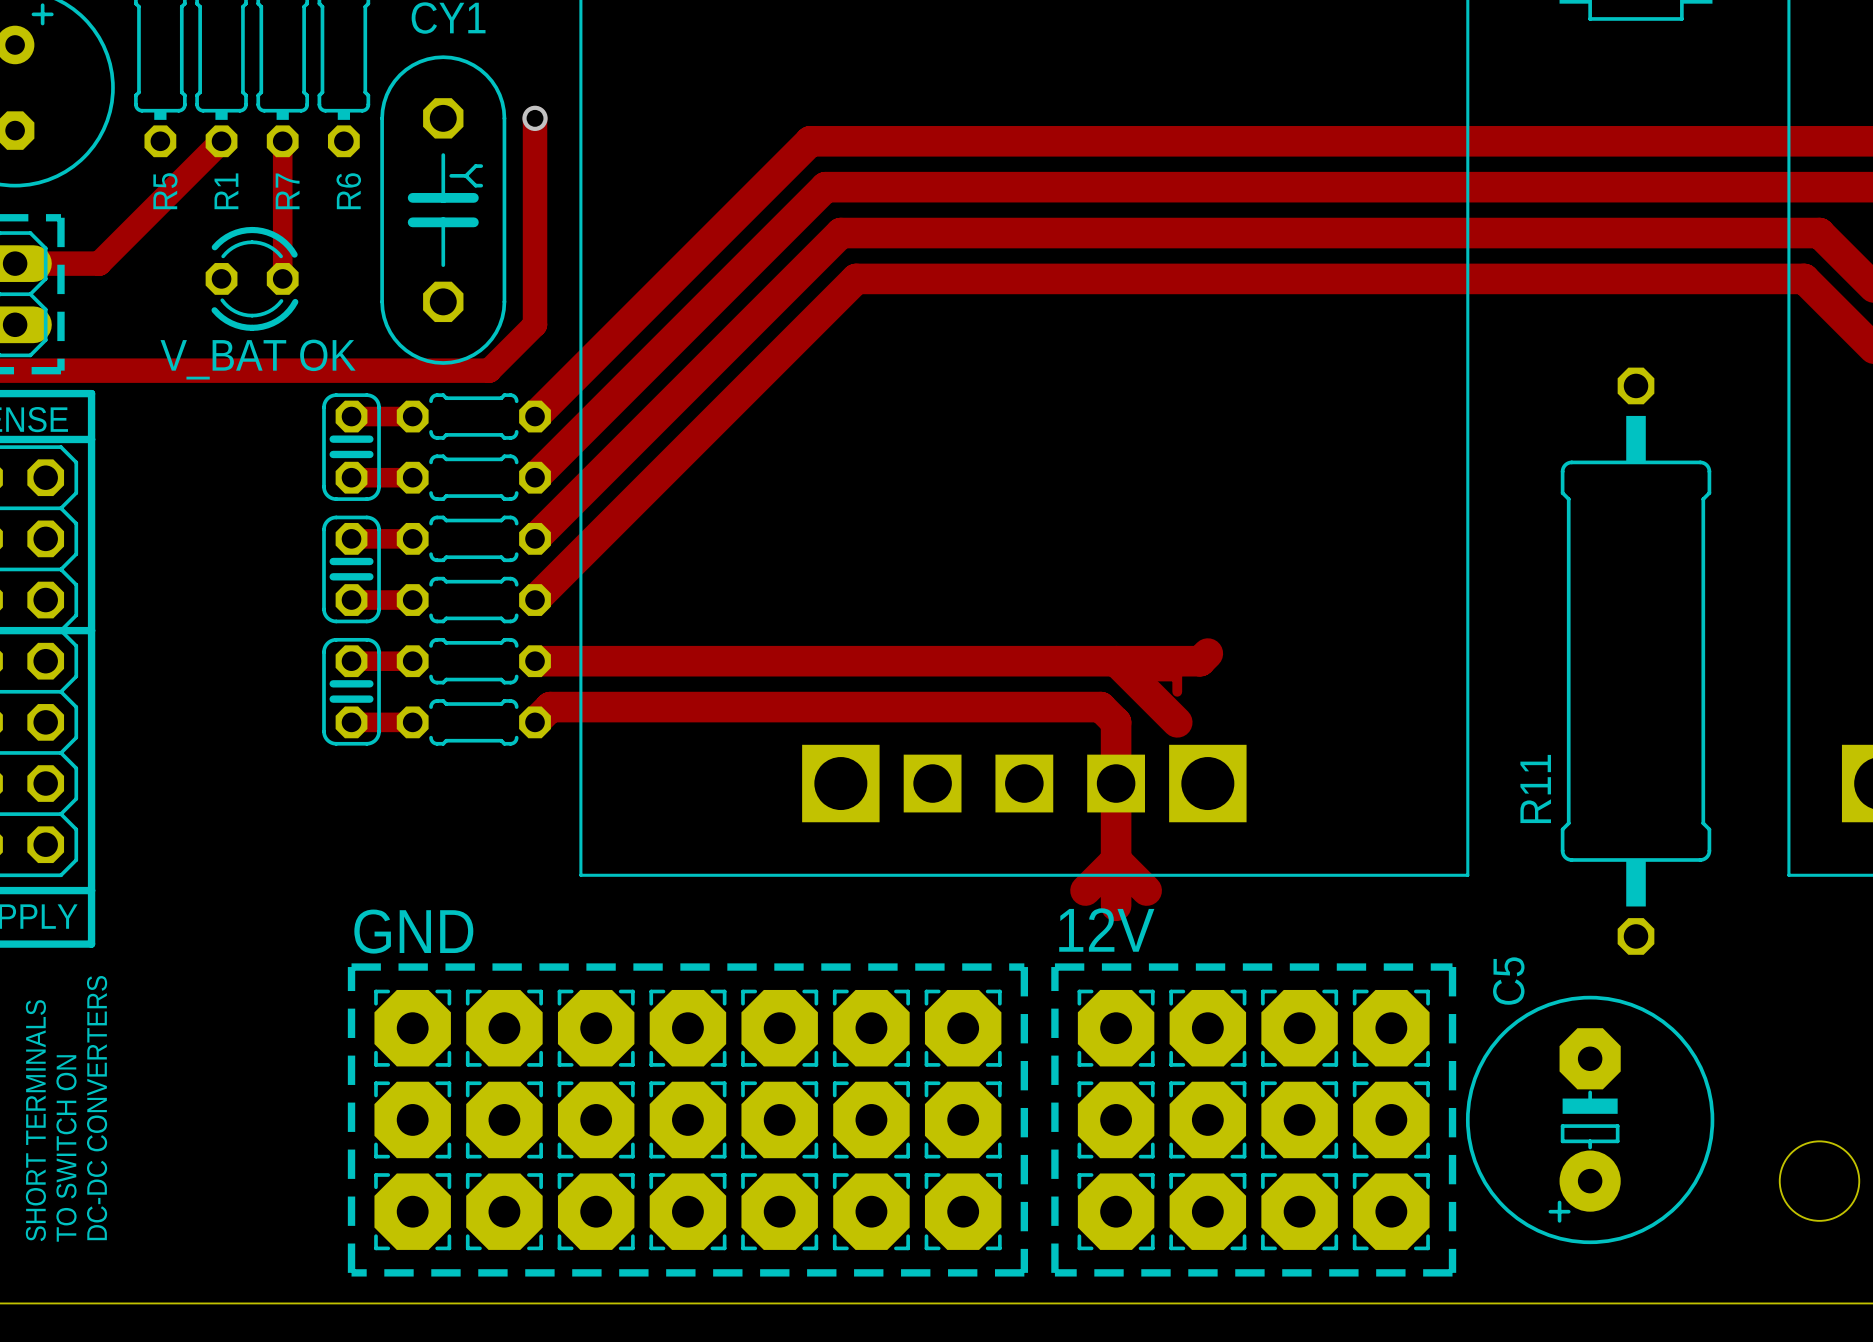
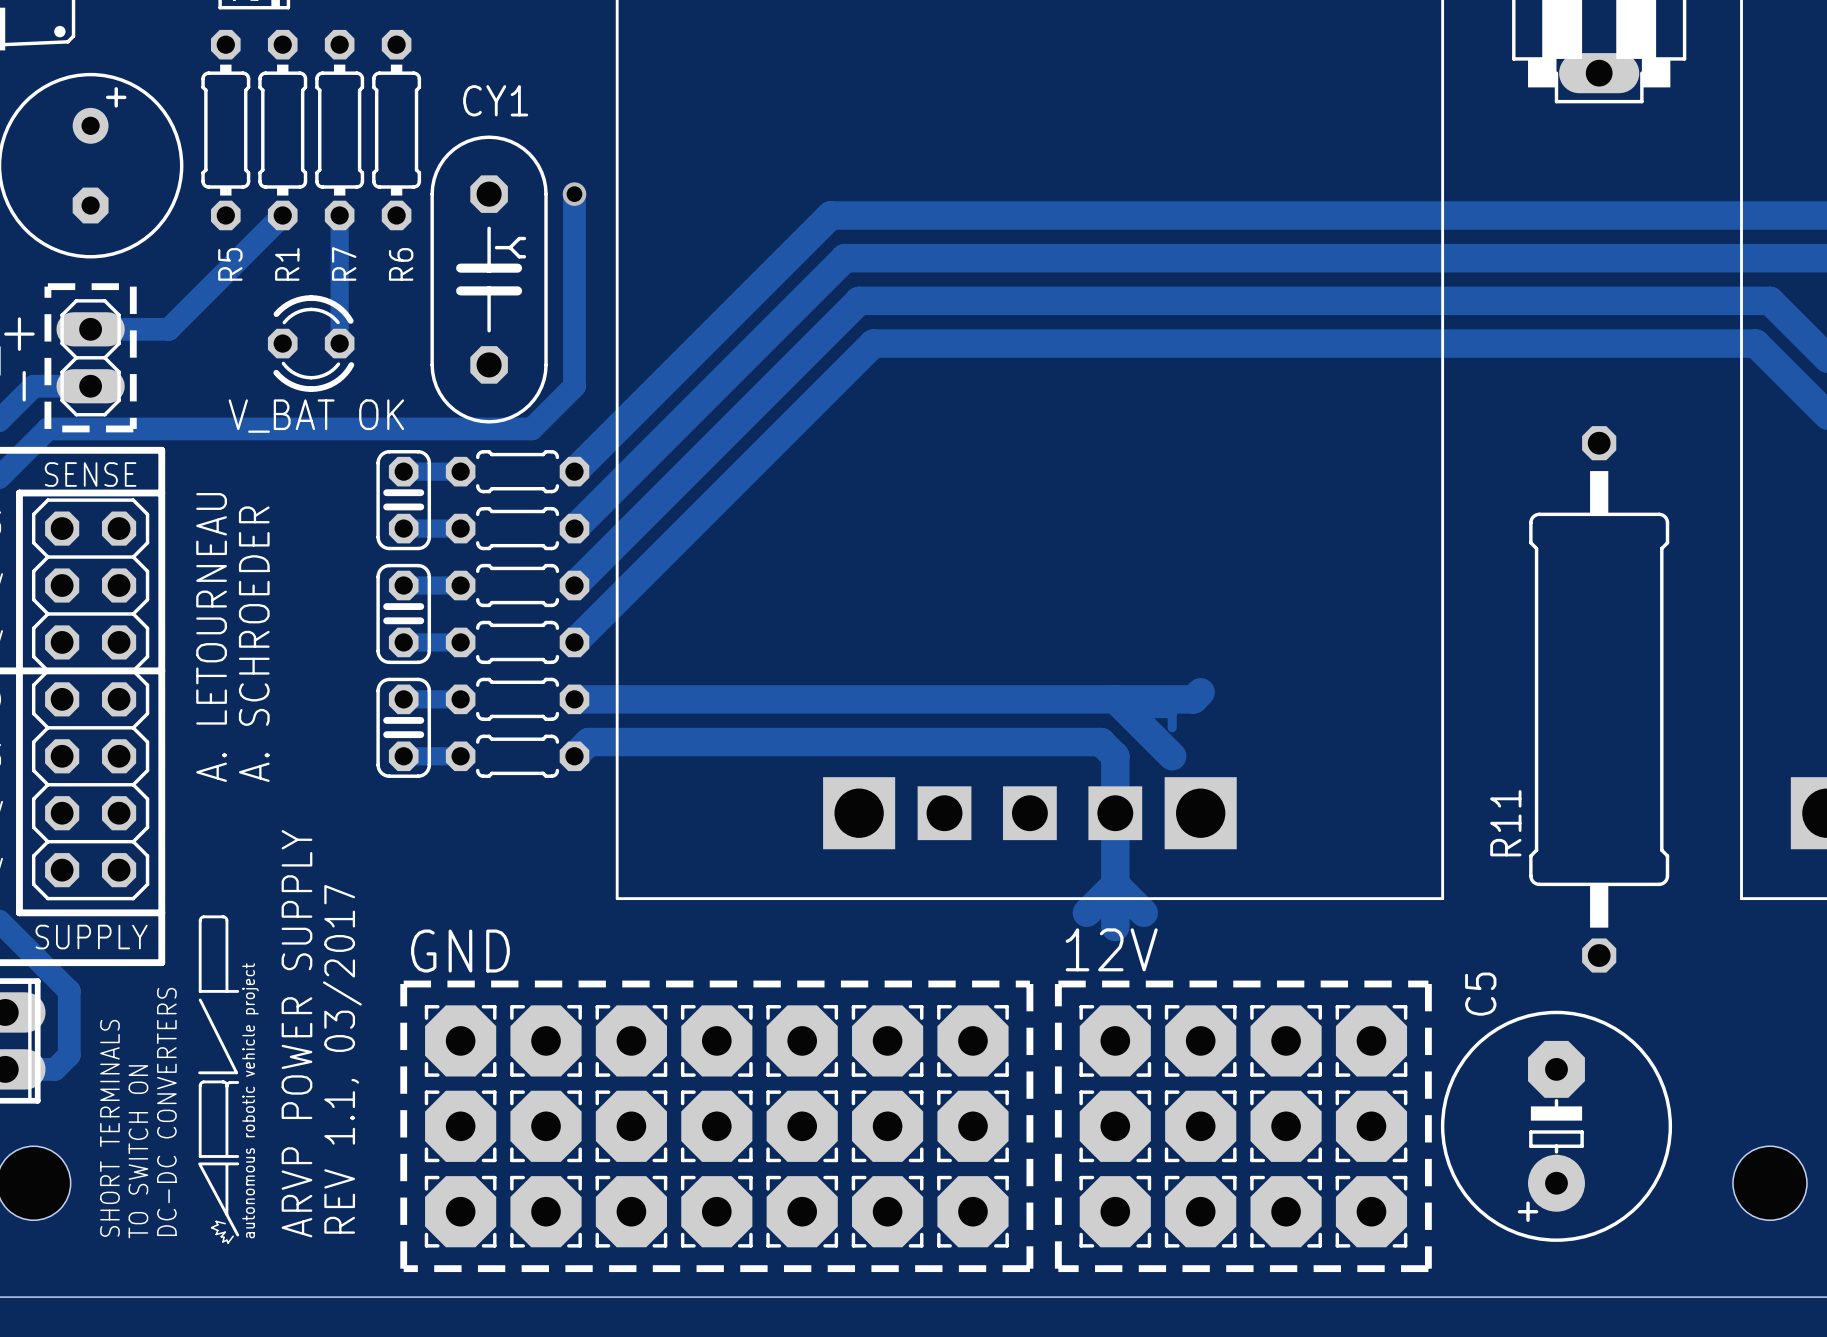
text: none -> A. LETOURNEAU (211, 637)
text: none -> A. SCHROEDER (254, 644)
drawing: none -> [198, 915, 240, 1244]
text: none -> ARVP POWER SUPPLY (296, 1033)
text: none -> REV 1.1, 03/2017 (342, 1059)

